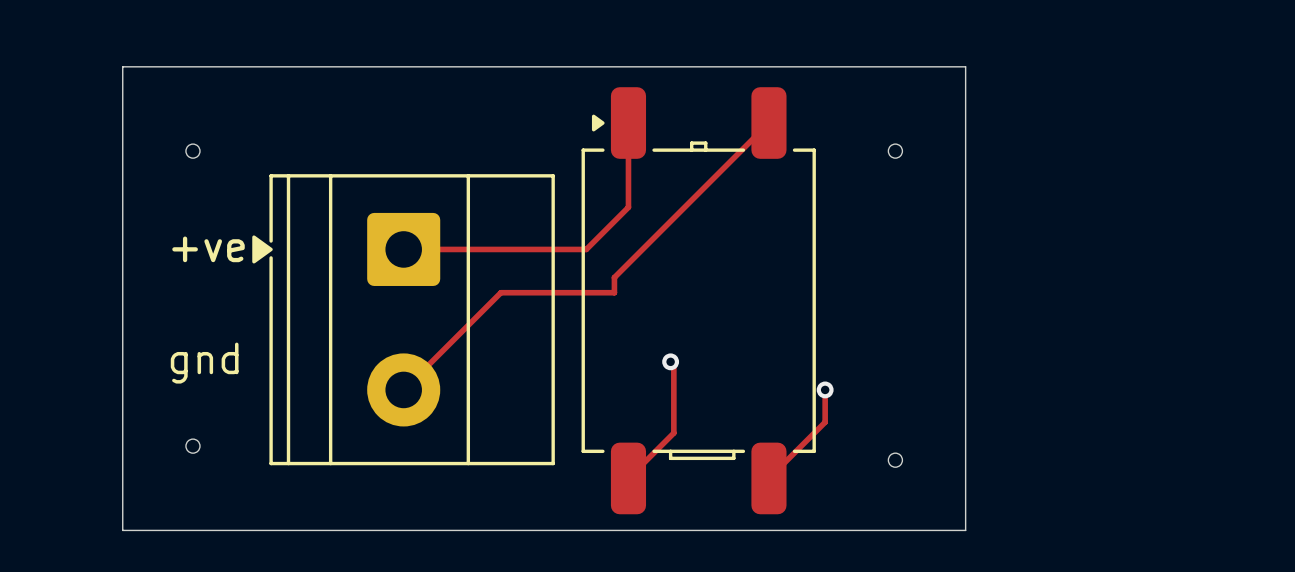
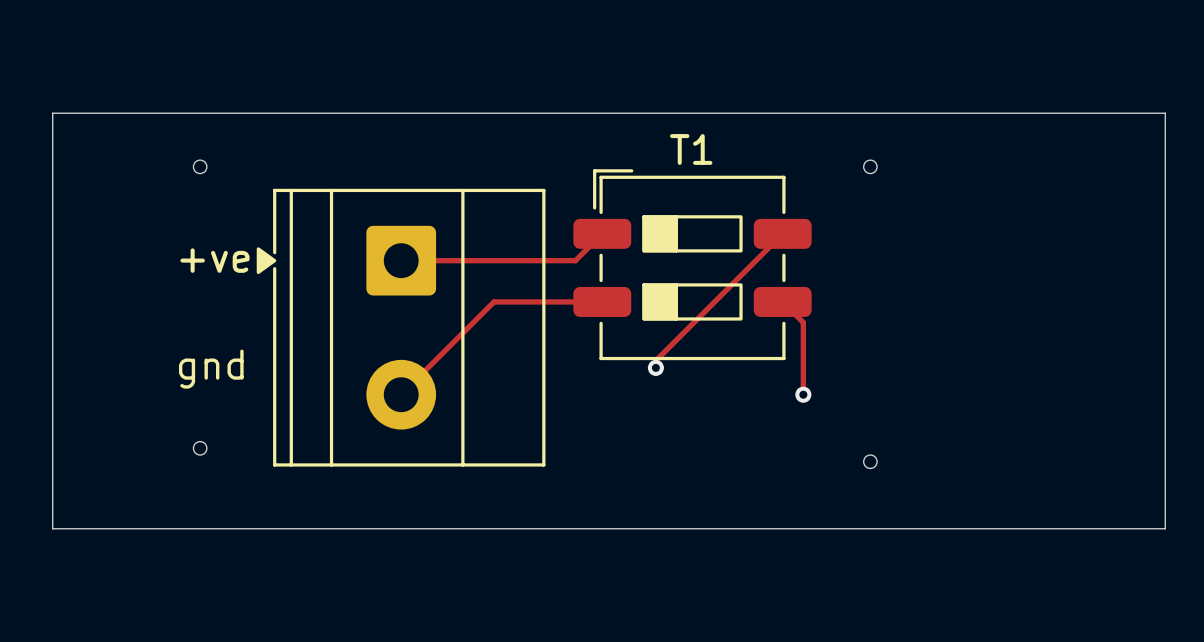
track: (628, 123) (628, 207) (614, 221) -> none
track: (768, 123) (614, 277) (614, 292) -> none
T1: none -> (692, 264)
part: (698, 300) -> none
track: (670, 361) (673, 365) (673, 433) (628, 478) -> (655, 367) (655, 360) (782, 233)
track: (825, 389) (825, 422) (768, 478) -> (803, 394) (803, 322) (782, 301)
board edge: (122, 530) (122, 66) (965, 66) (965, 530) -> (133, 528) (52, 528) (52, 113) (1165, 113) (1165, 528) (937, 528)

